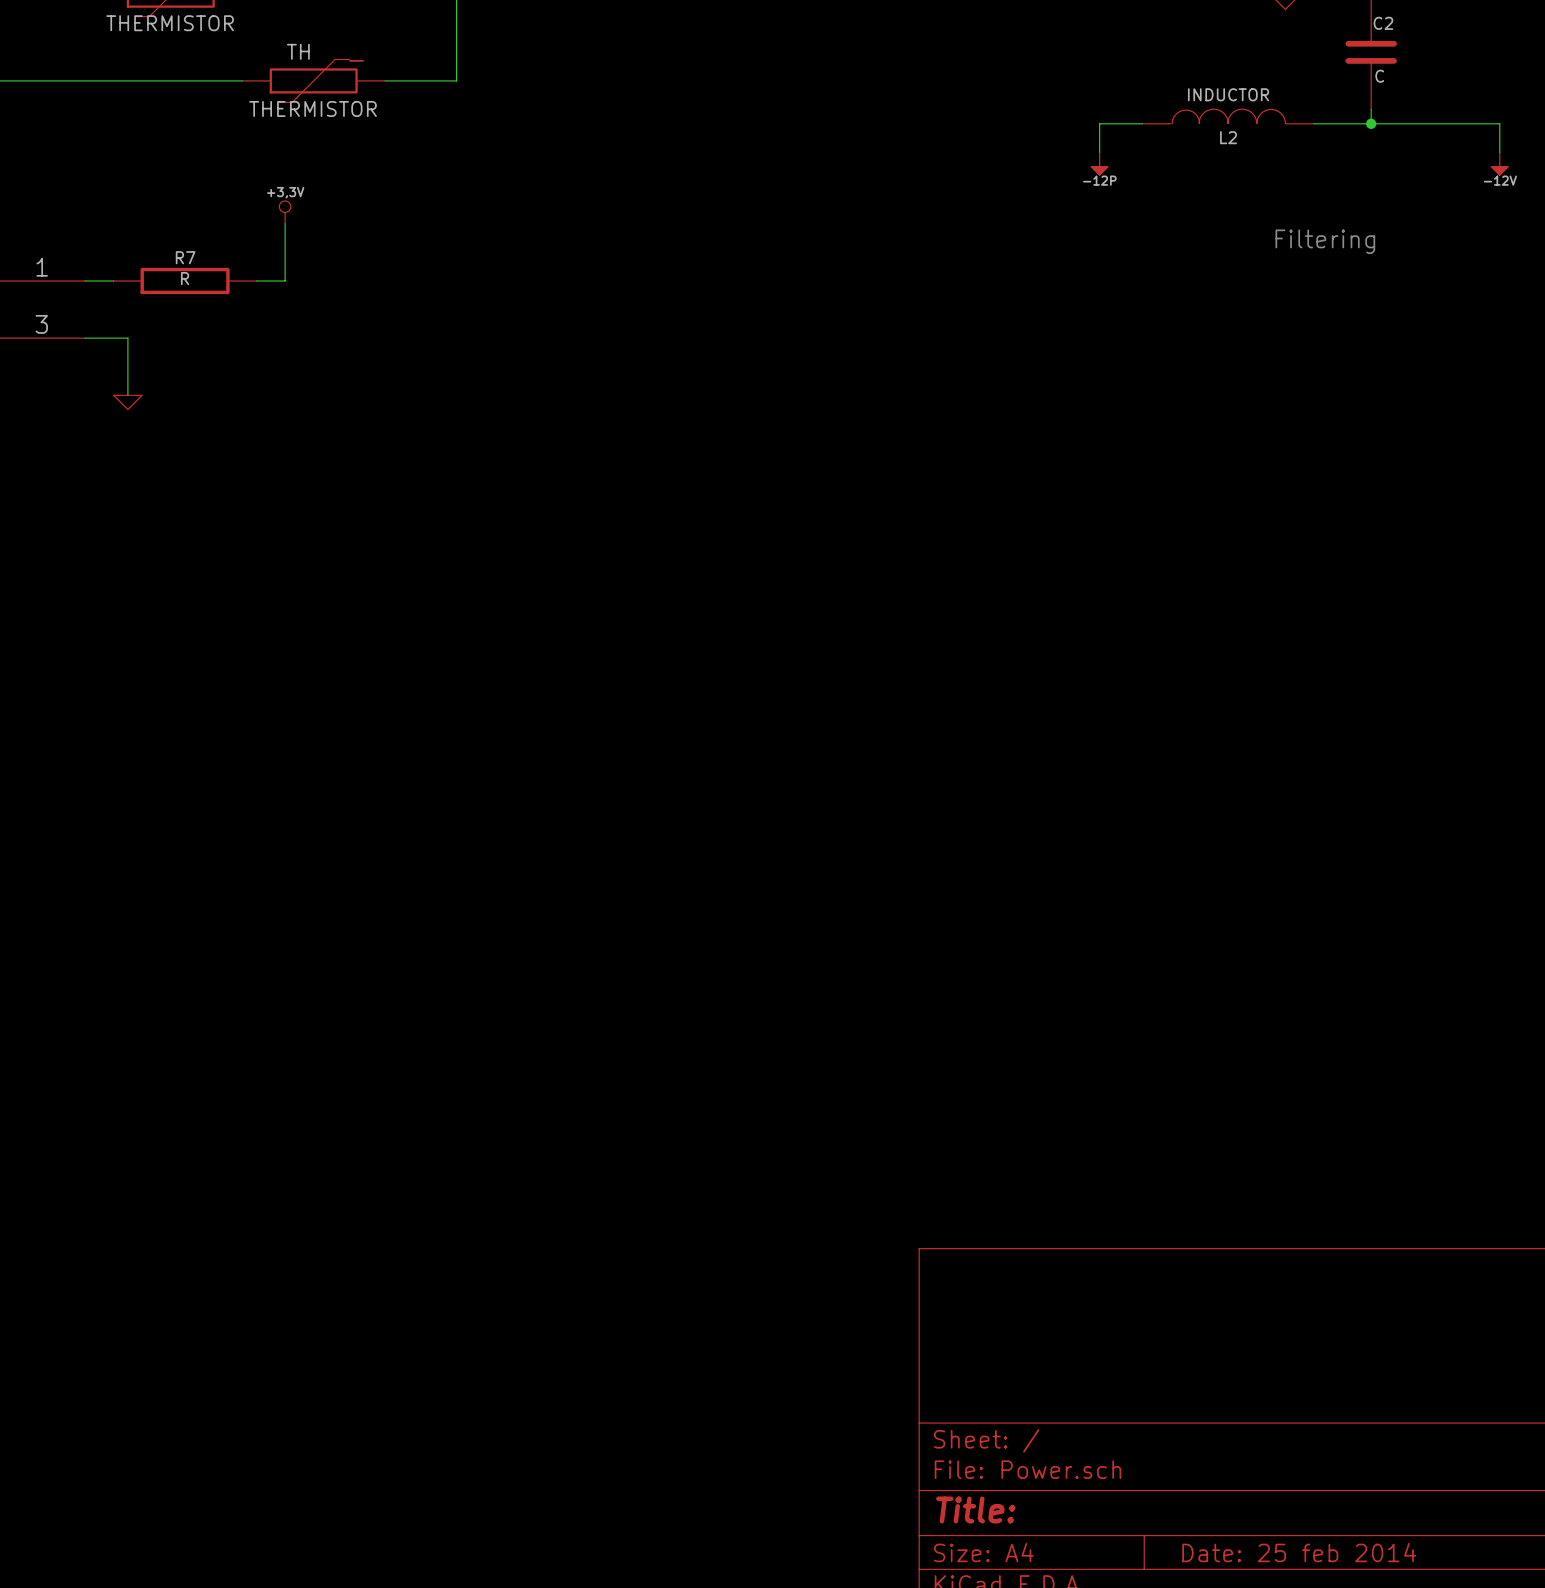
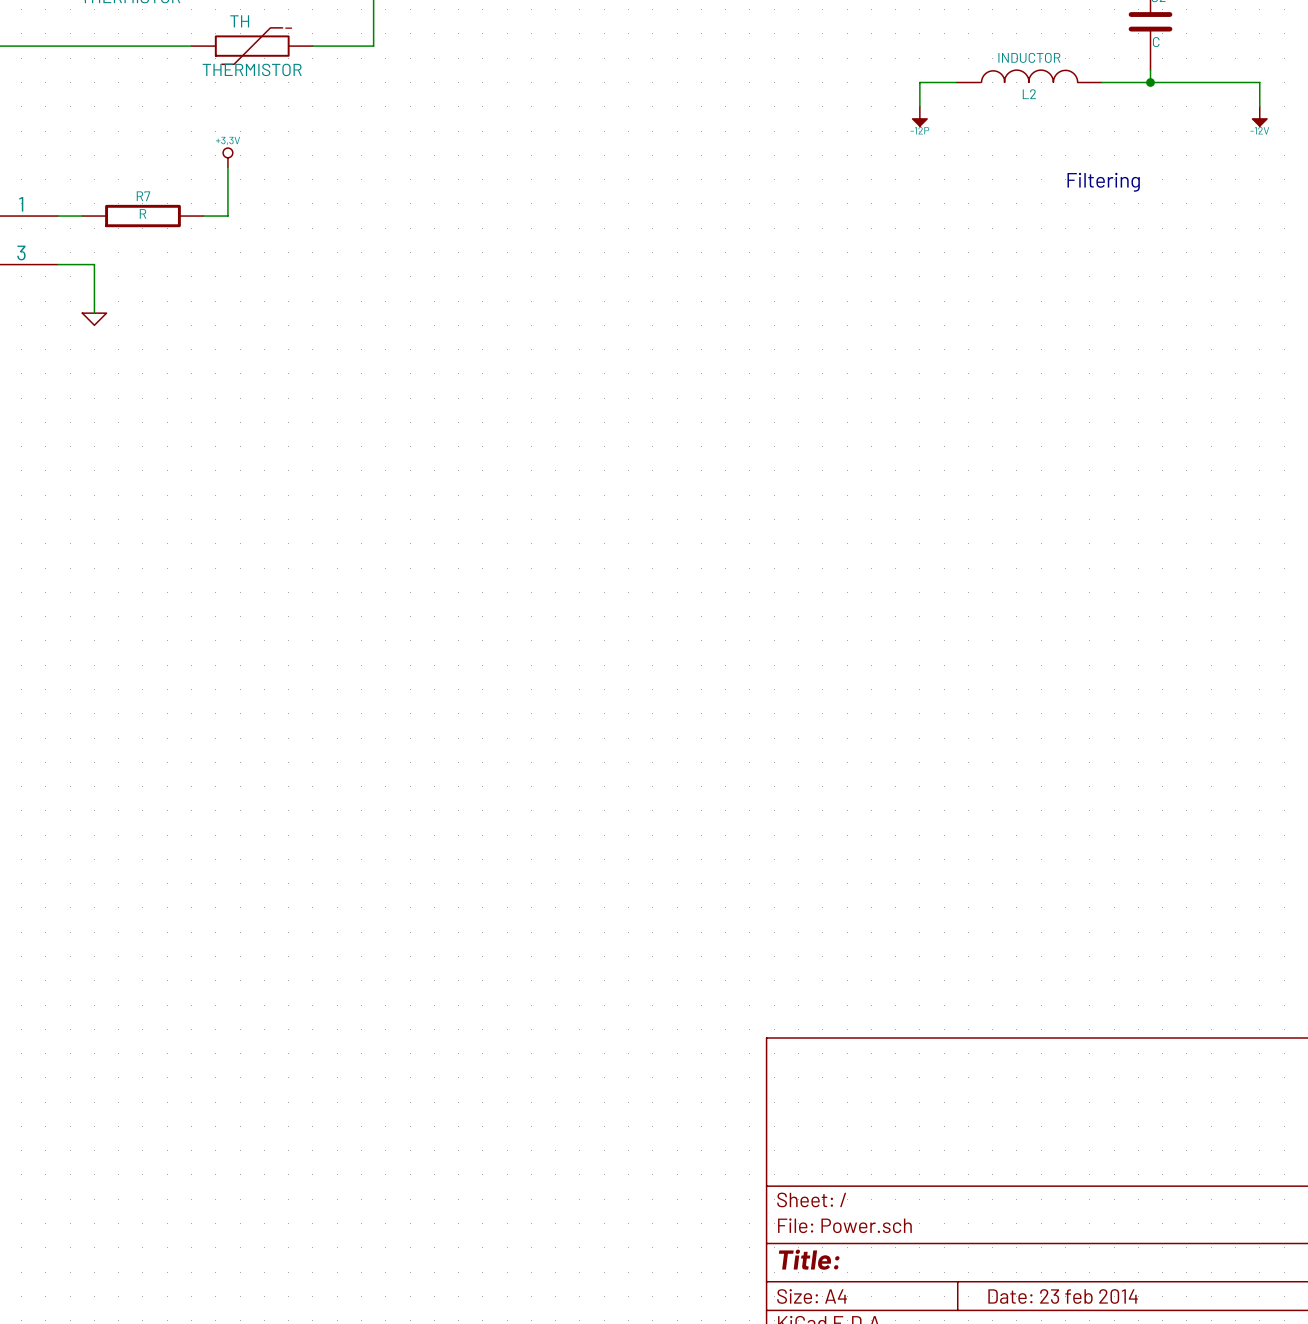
title block: Date: 25 feb 2014 (1299, 1552) -> Date: 23 feb 2014 (1063, 1296)

